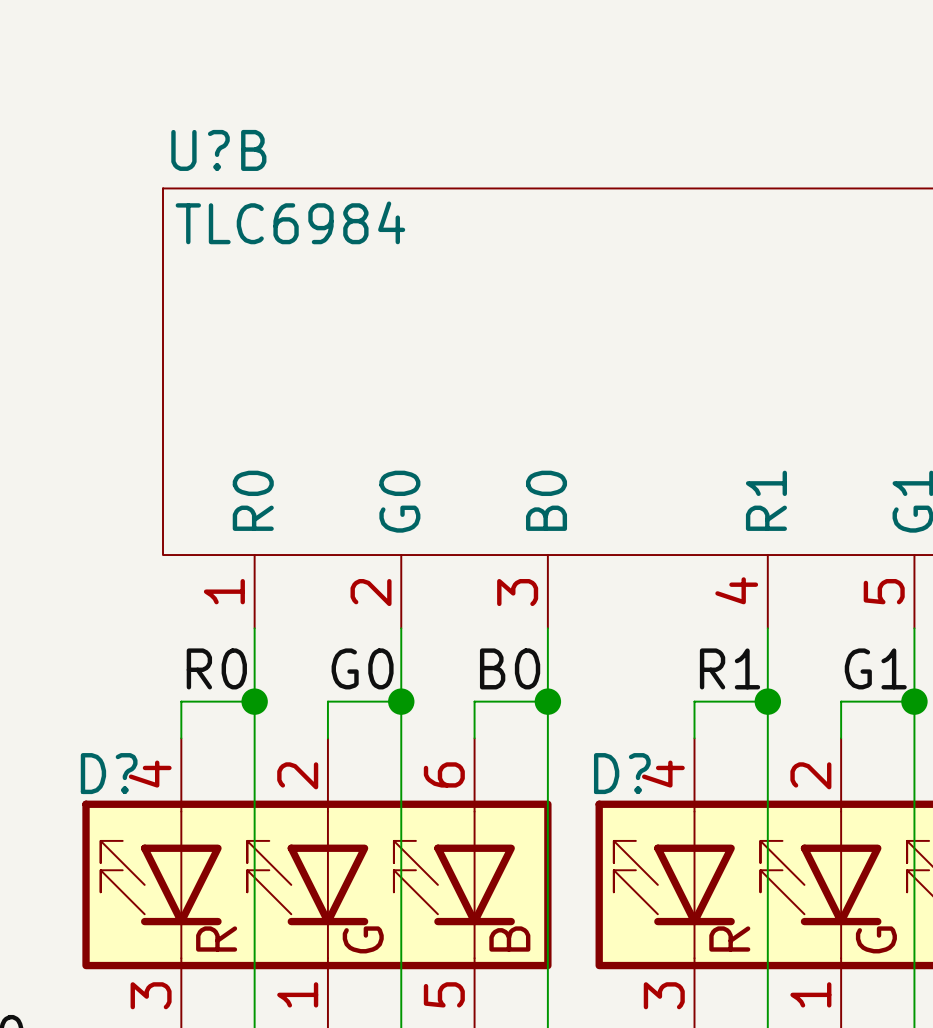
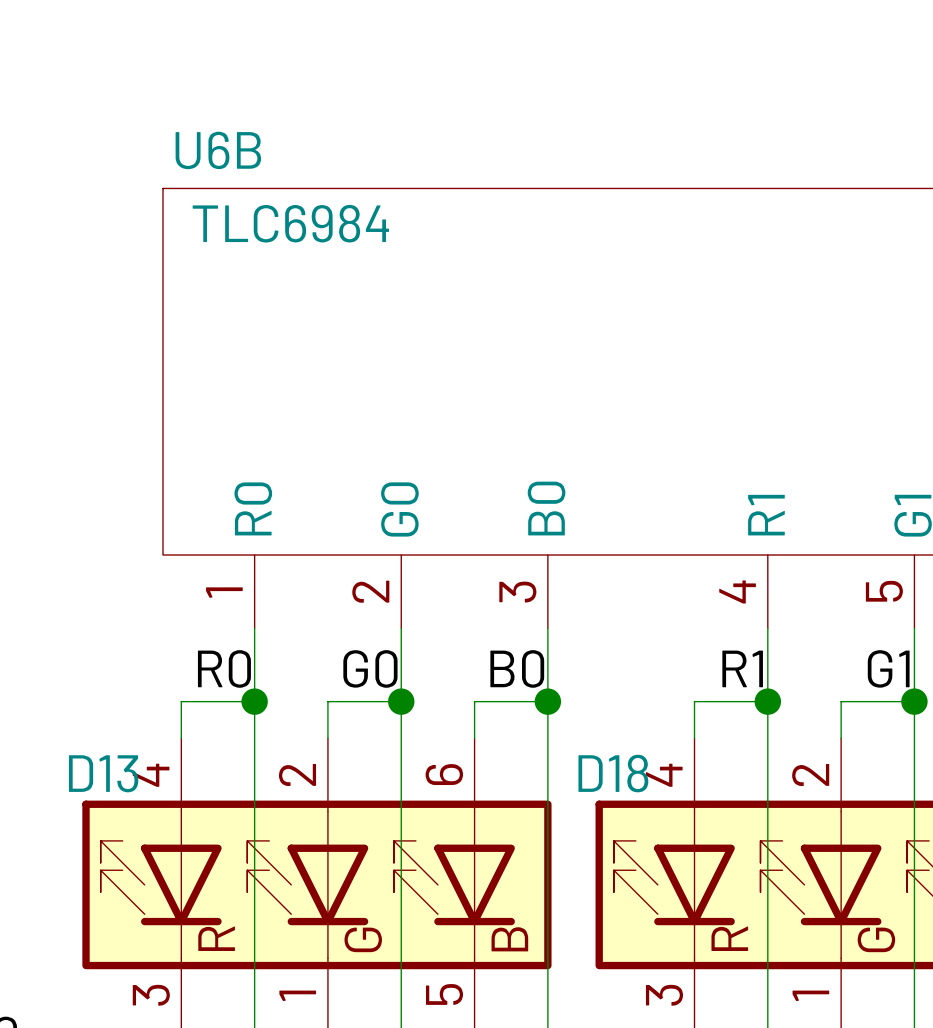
U?B name: U?B (218, 150) -> U6B (218, 150)
D? name: D? (109, 773) -> D13 (103, 773)
D? name: D? (622, 773) -> D18 (613, 773)

